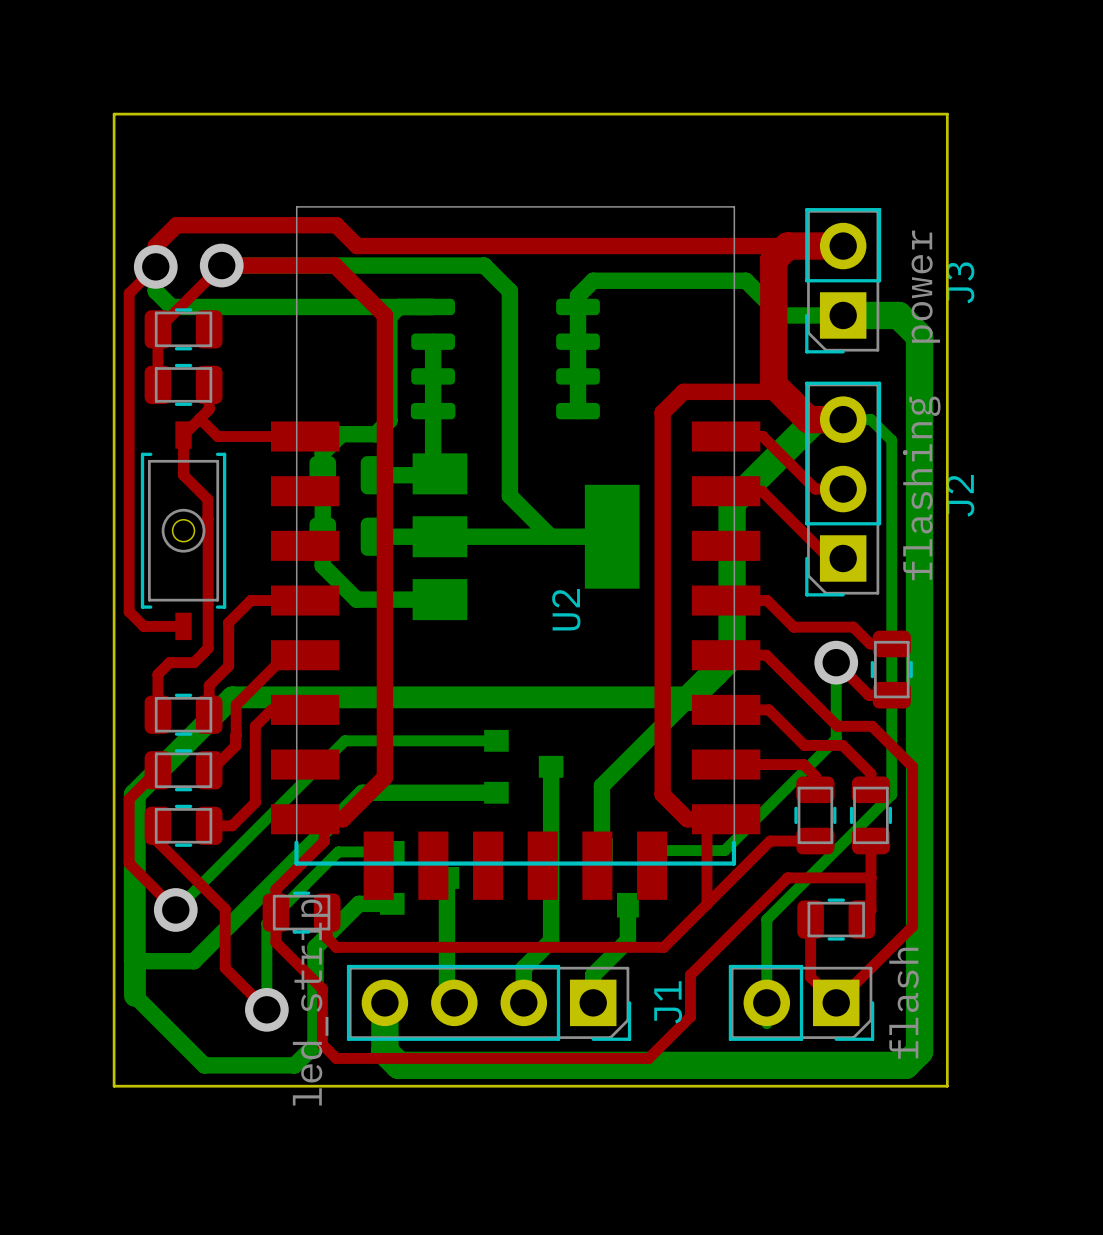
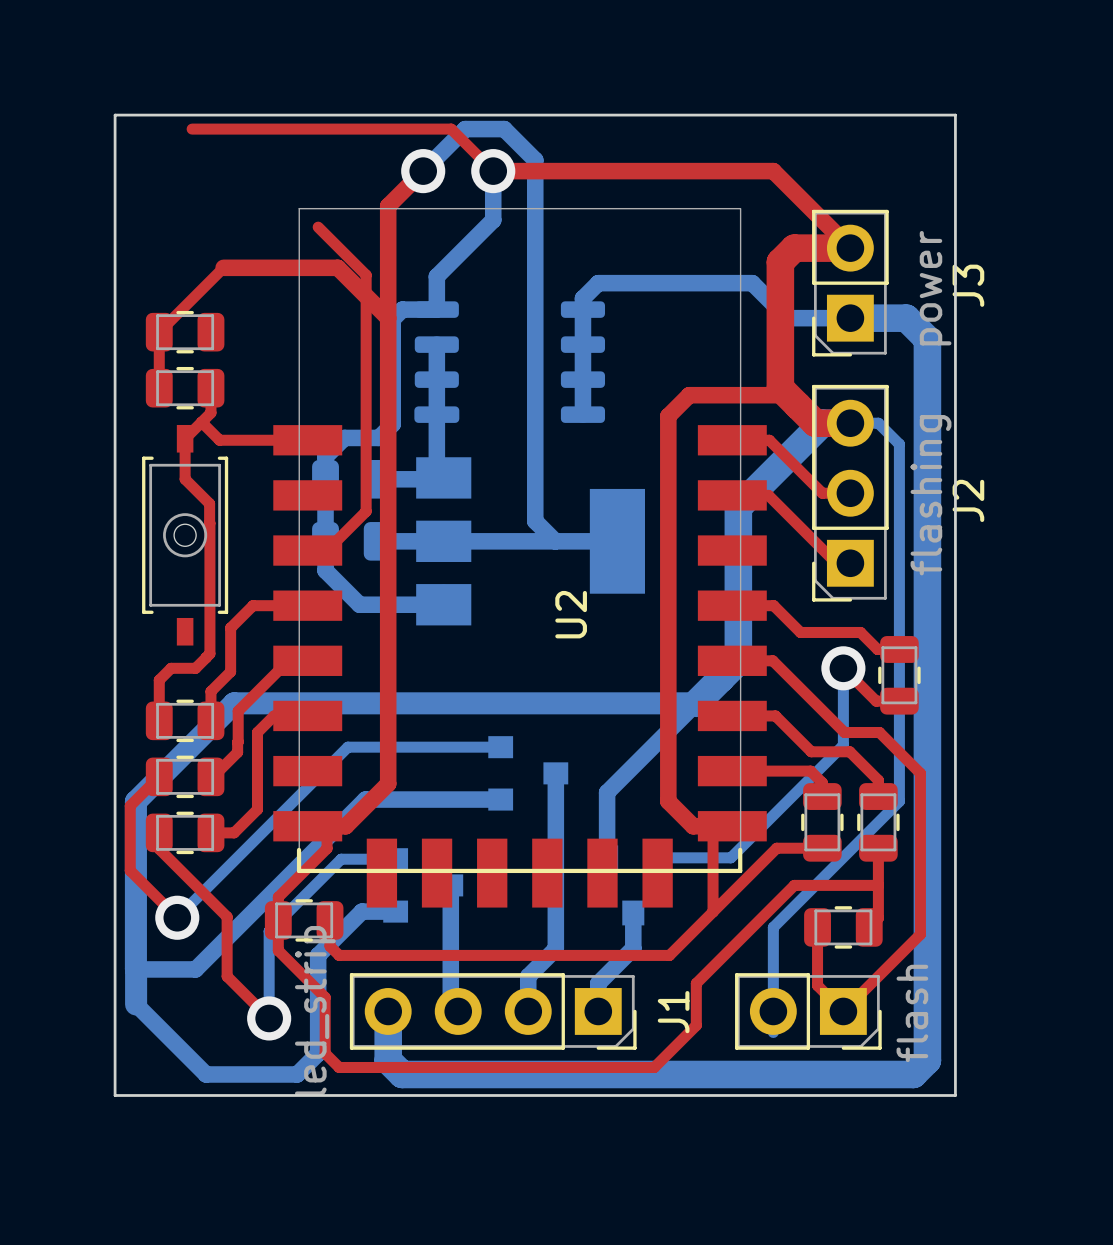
top track: none -> (423, 171) (388, 206) (388, 318)
via: none -> (423, 171)
bottom track: none -> (493, 171) (493, 220) (436, 276) (436, 309)
via: none -> (493, 171)
top track: none -> (318, 227) (366, 275) (366, 511) (327, 550)
top track: (843, 246) (357, 246) (336, 225) (176, 225) (155, 246) (155, 266) (129, 293) (129, 611) (143, 626) (183, 626) -> (850, 248) (773, 171) (493, 171) (451, 129) (192, 129)
bottom track: (221, 265) (484, 265) (509, 291) (509, 496) (530, 516) -> (423, 171) (465, 129) (504, 129) (535, 160) (535, 521)
via: (221, 265) -> none
bottom track: (155, 266) (155, 291) (171, 306) (399, 306) -> none
via: (155, 266) -> none

